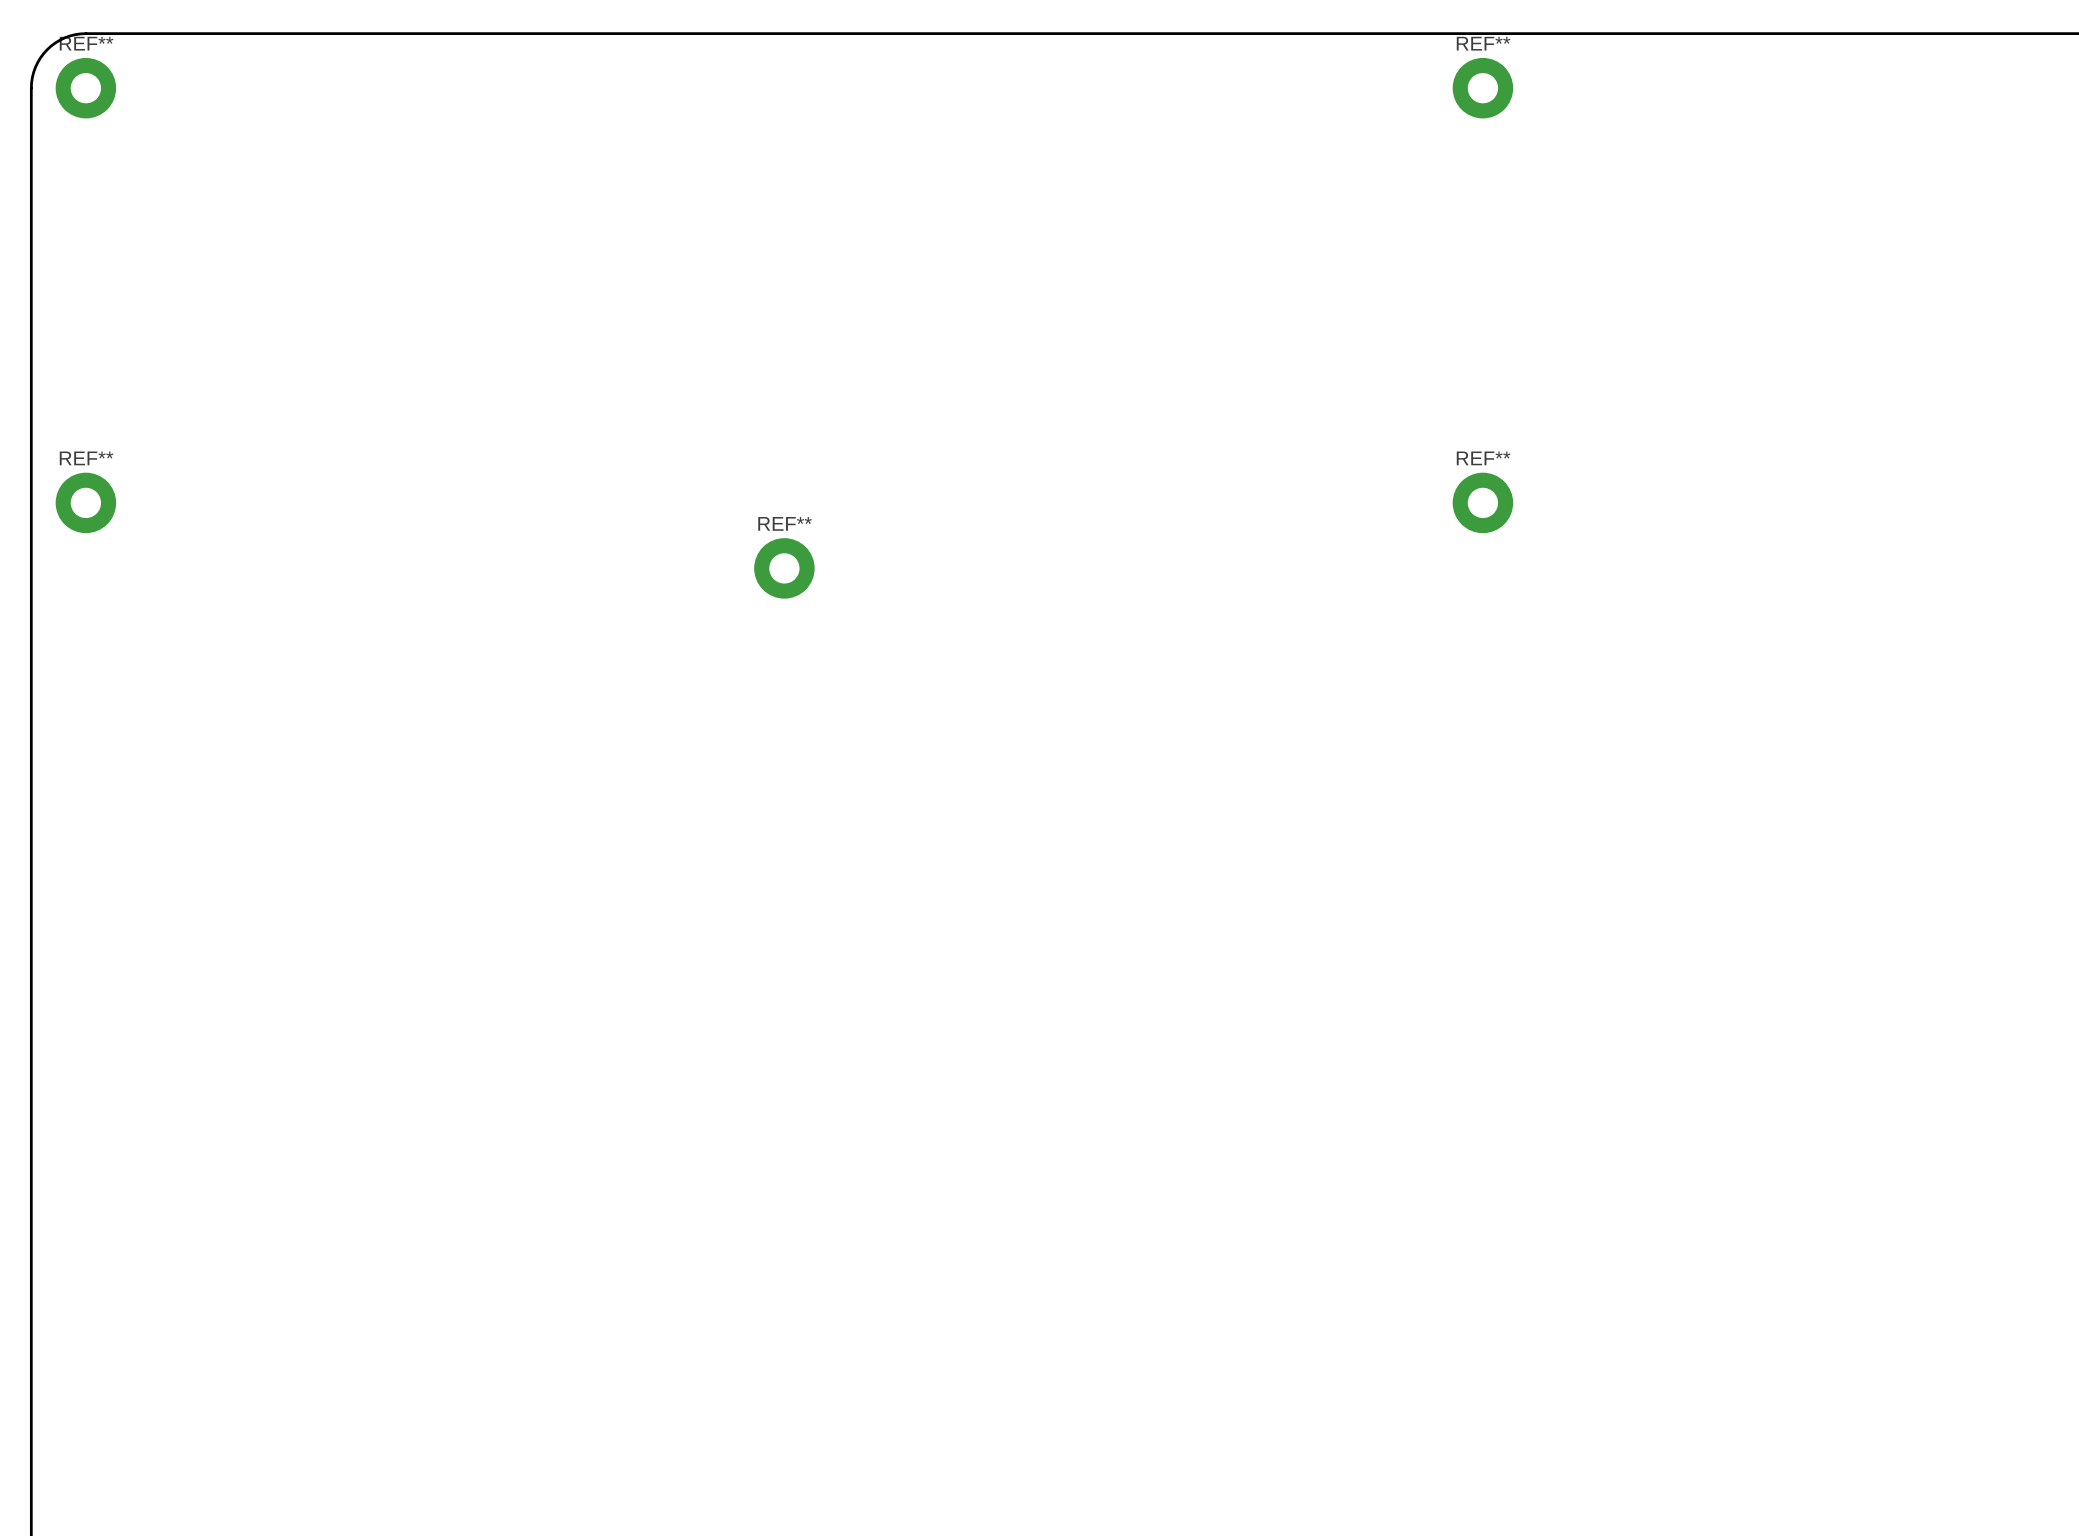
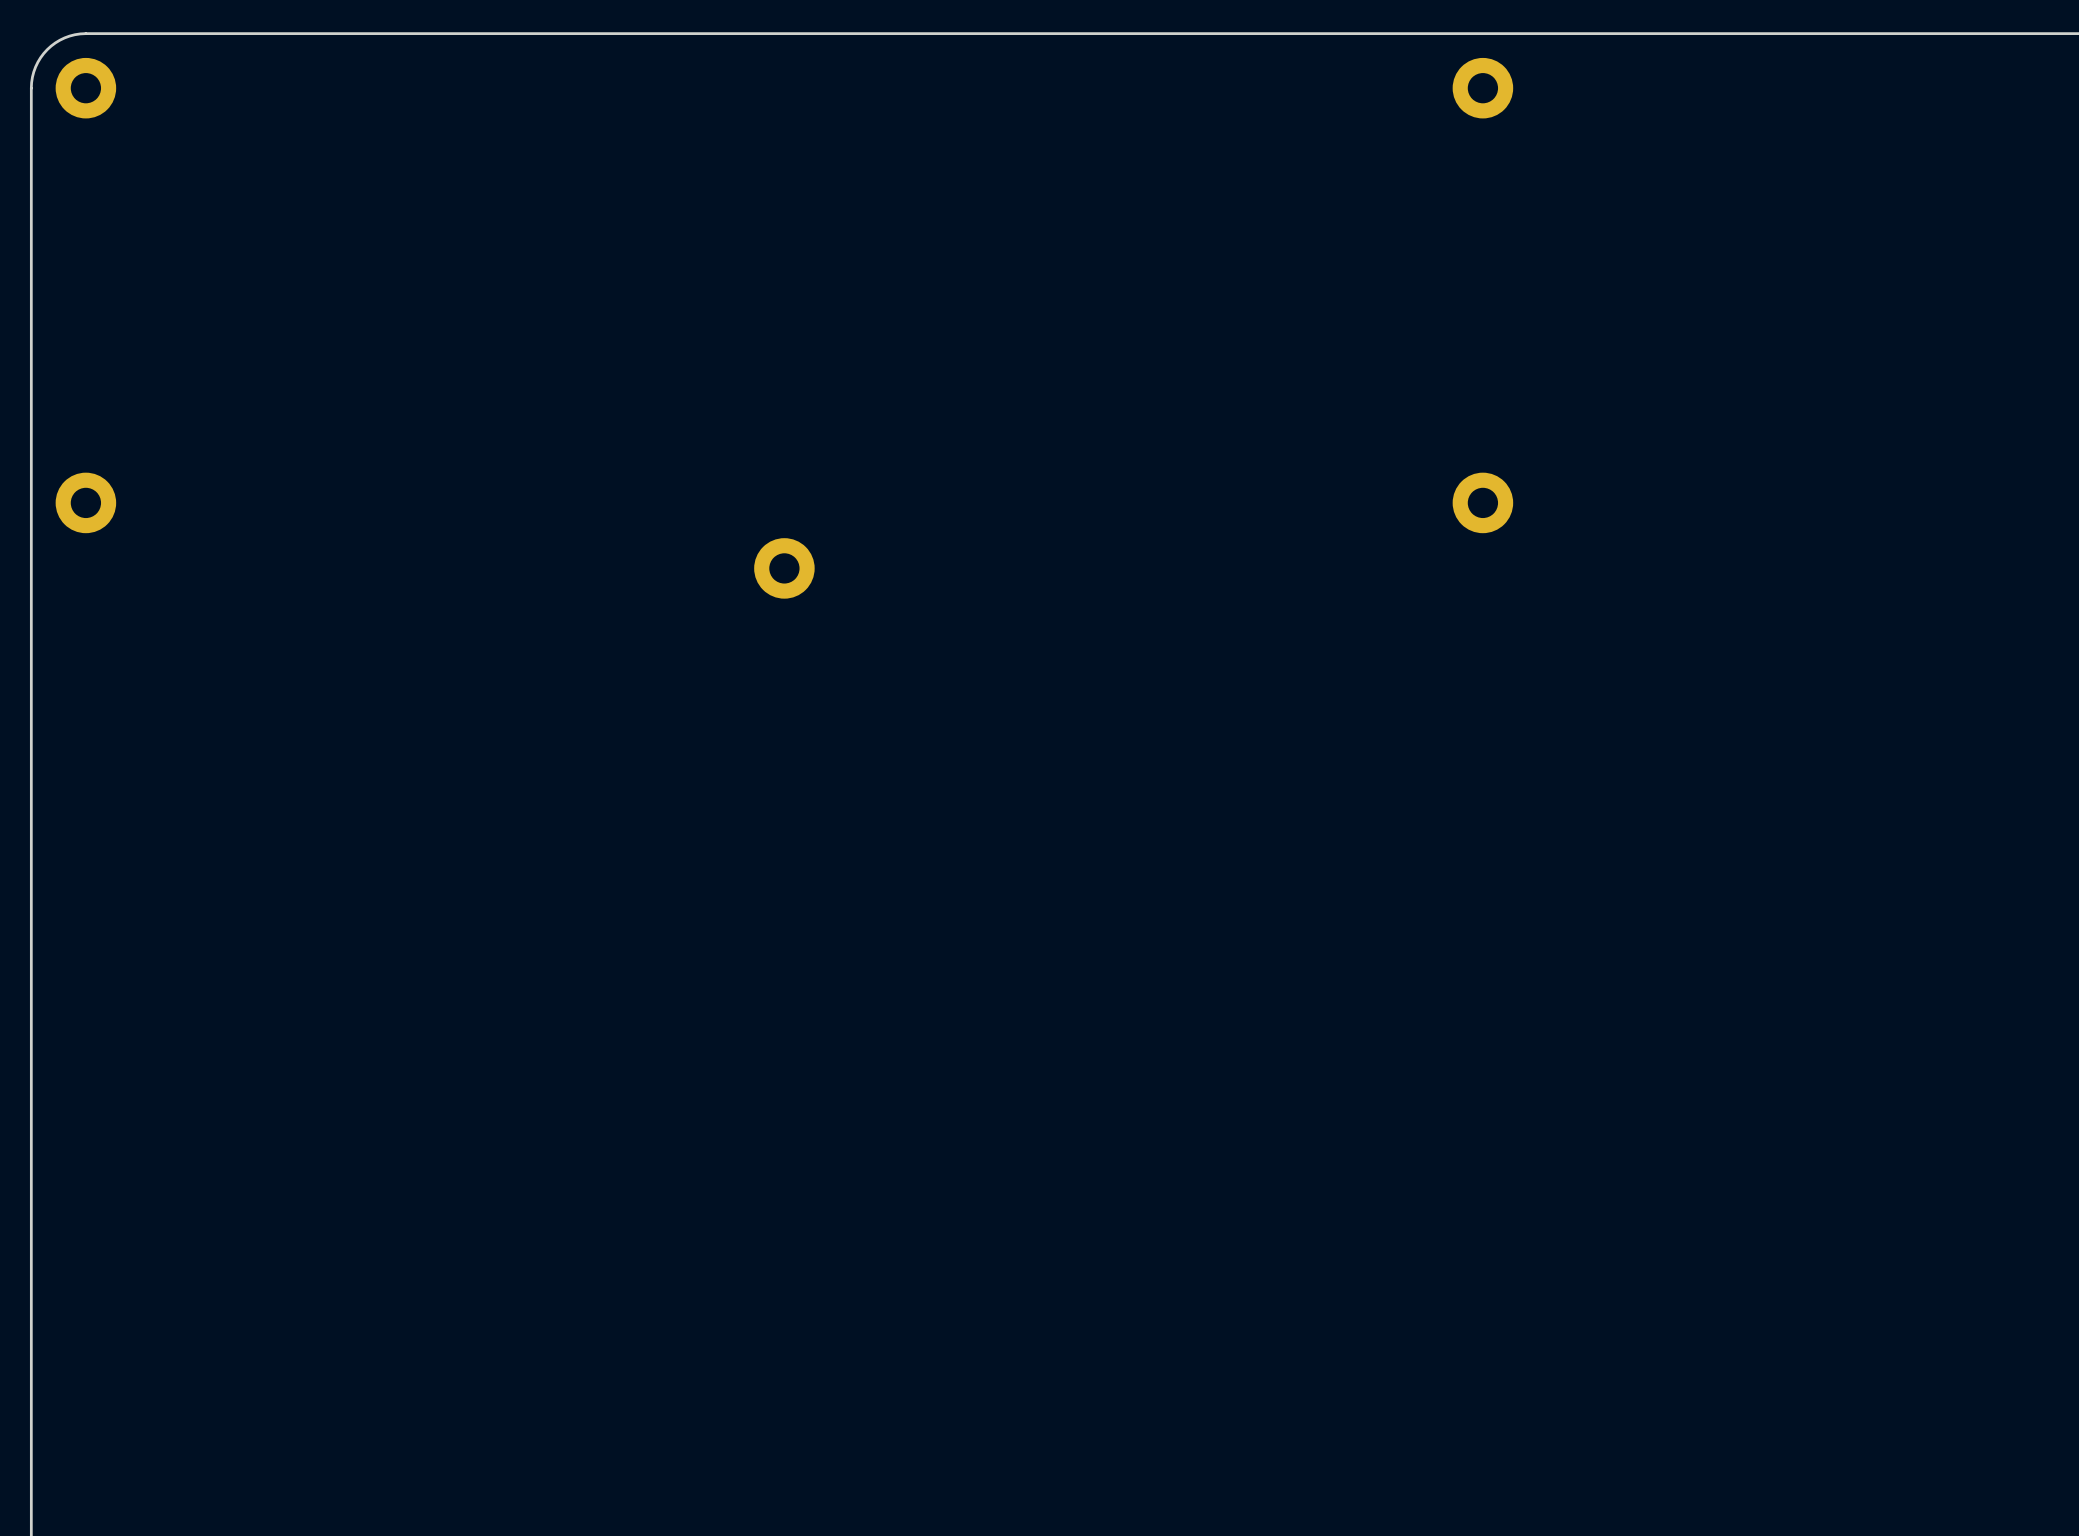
REF** name: REF** (86, 43) -> none
REF** name: REF** (1483, 43) -> none
REF** name: REF** (86, 458) -> none
REF** name: REF** (1483, 458) -> none
REF** name: REF** (785, 523) -> none

